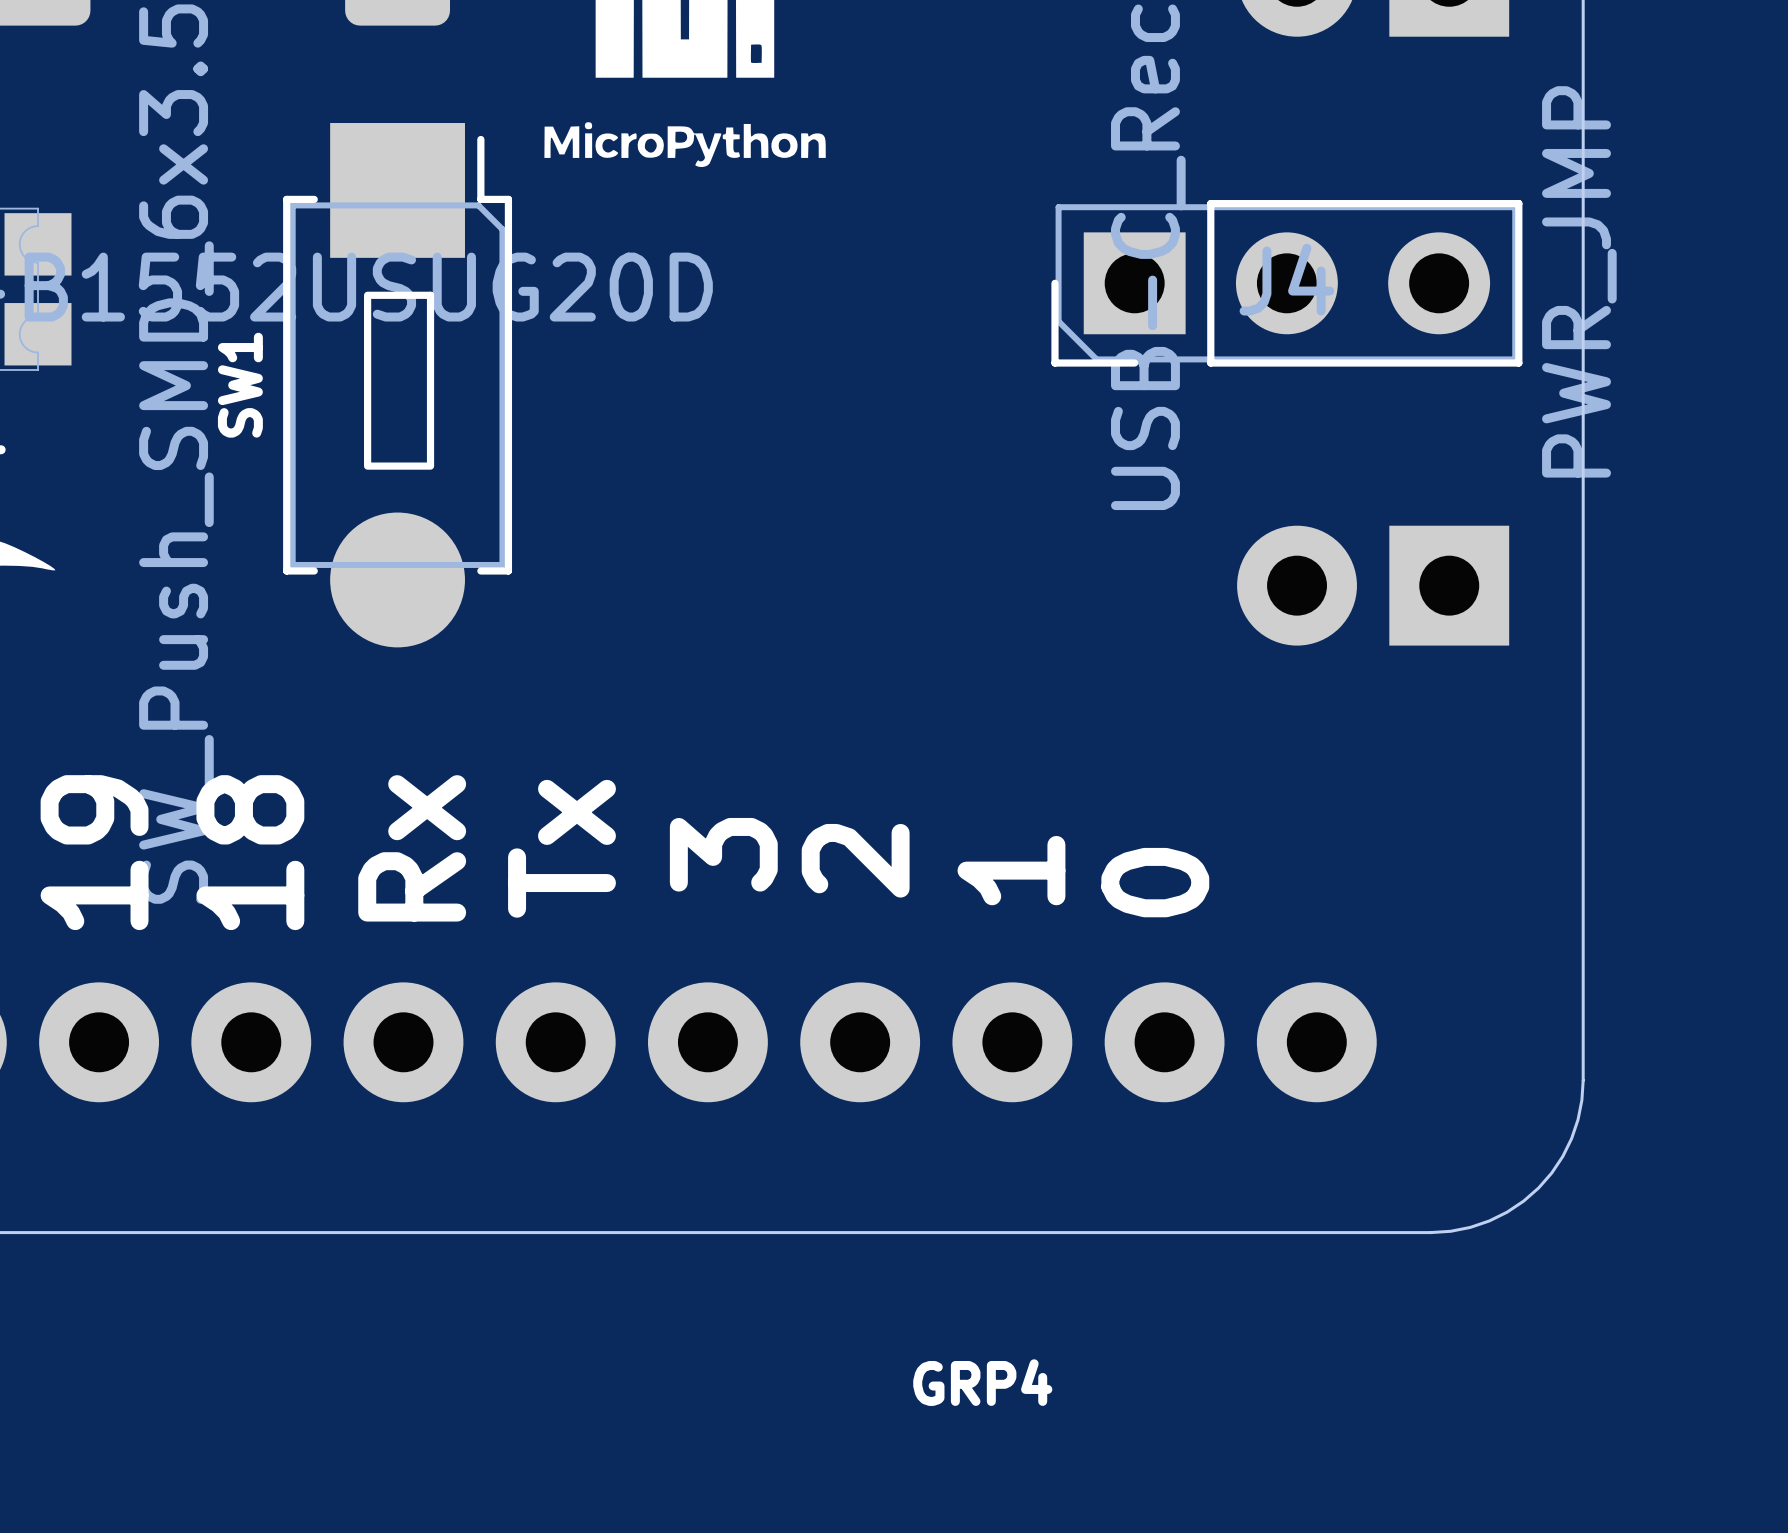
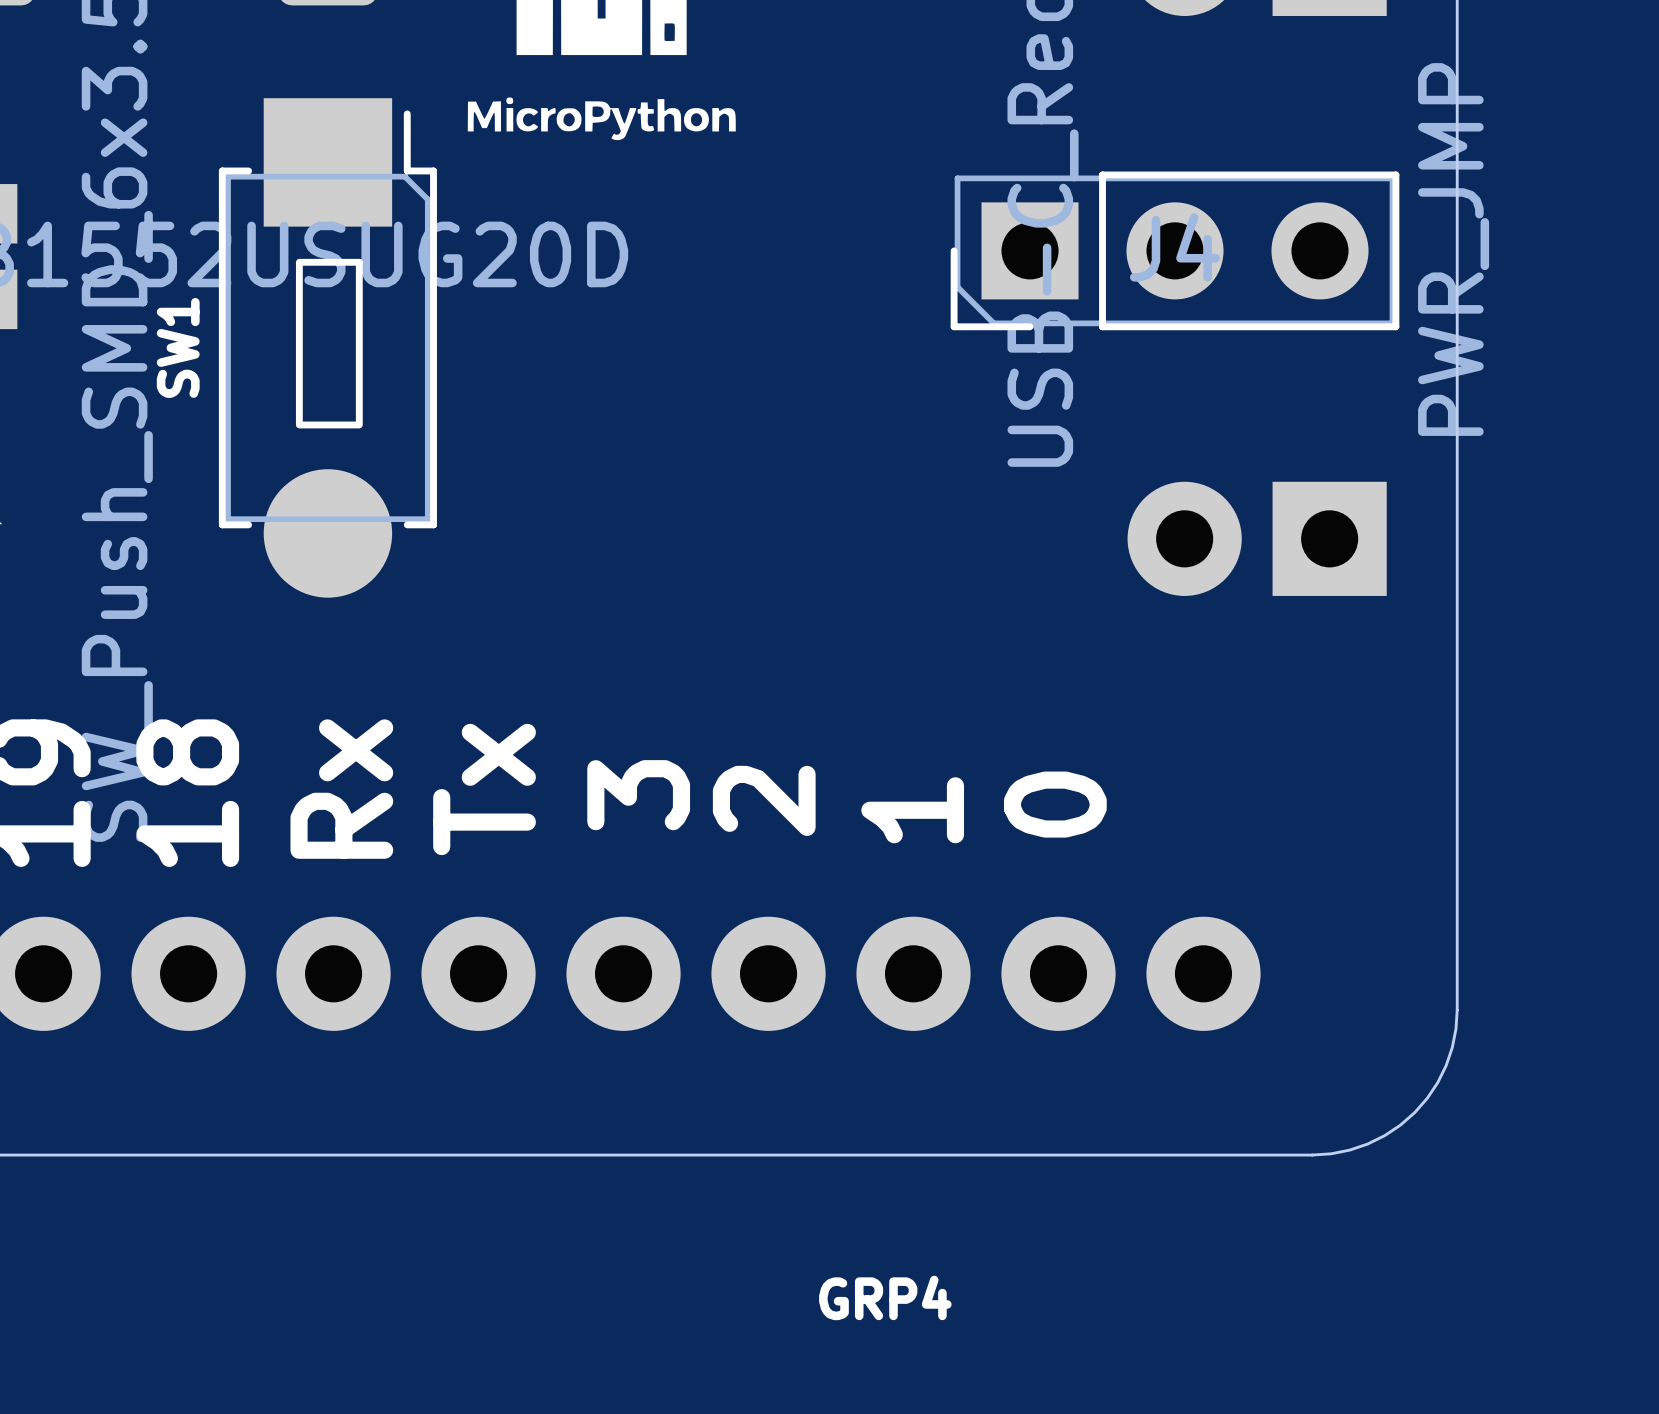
text position: 0 (1155, 882) -> 0 (1055, 804)

